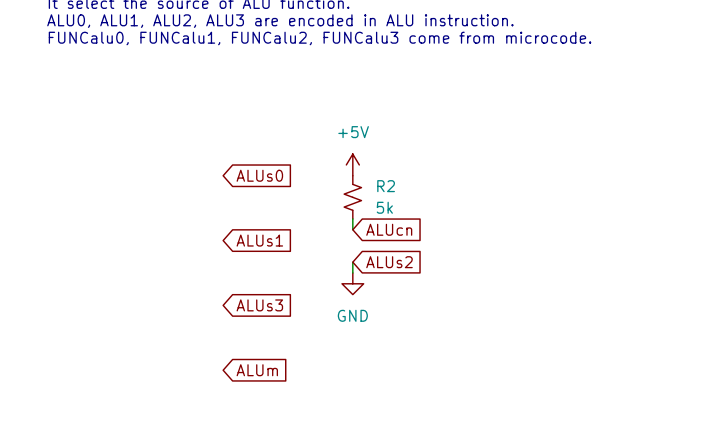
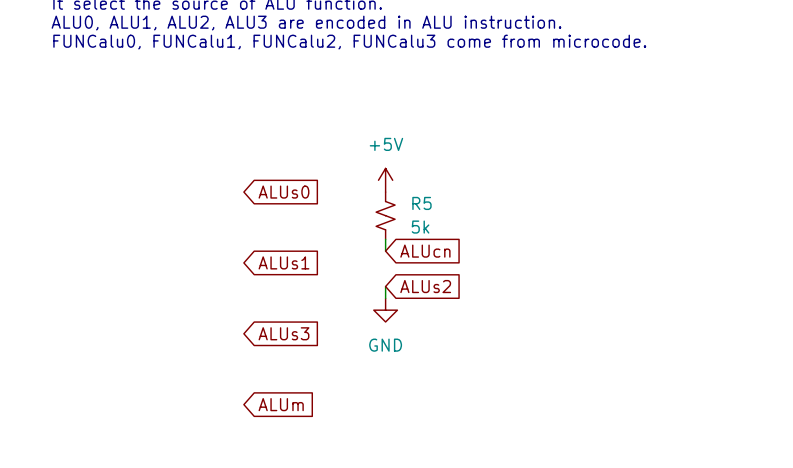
R2 name: R2 (386, 186) -> R5 (421, 203)

